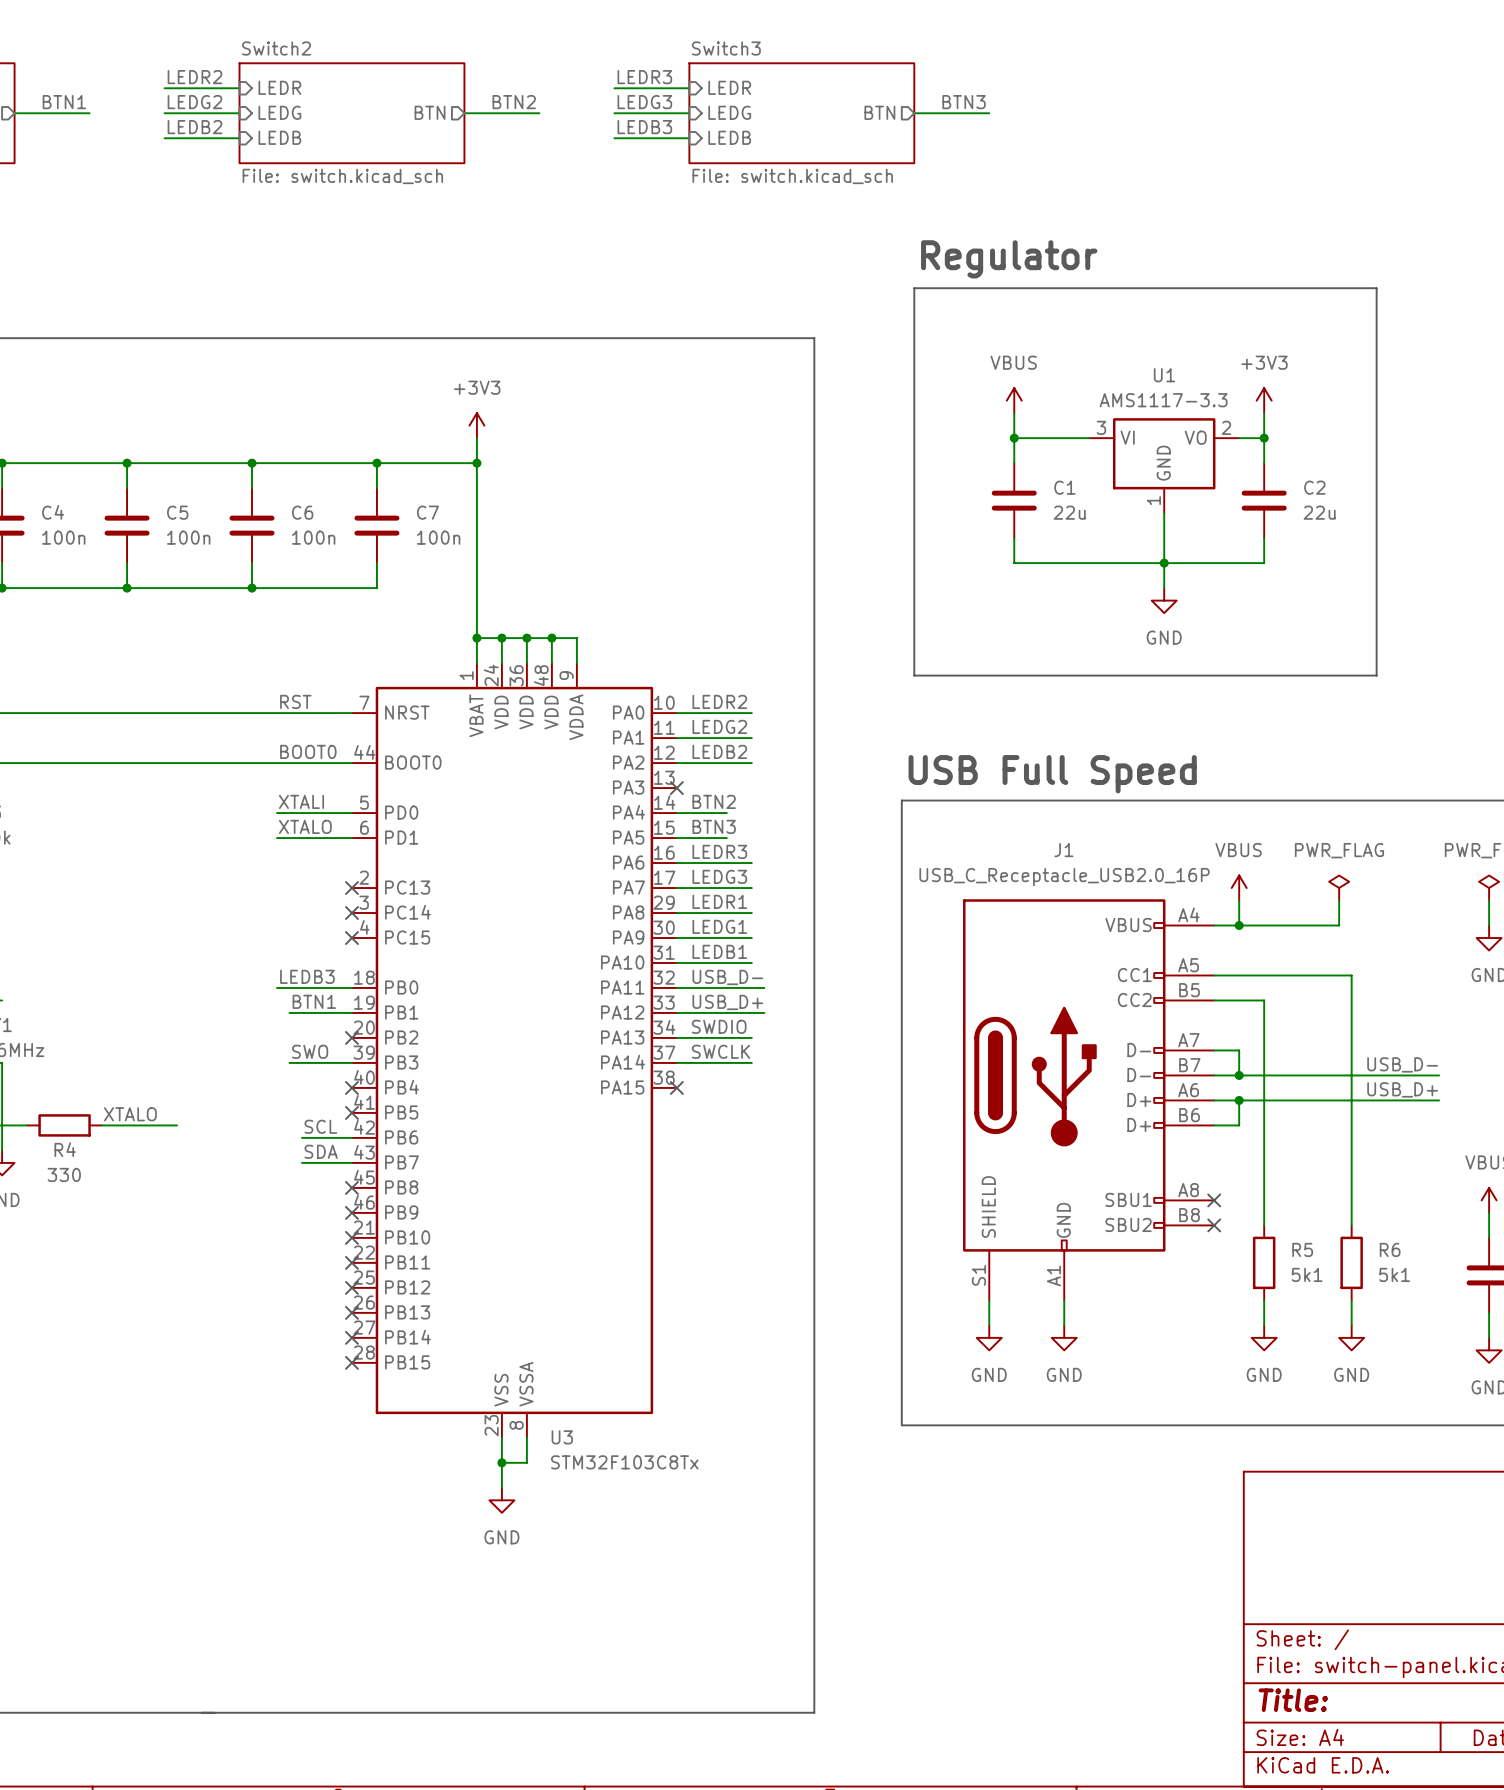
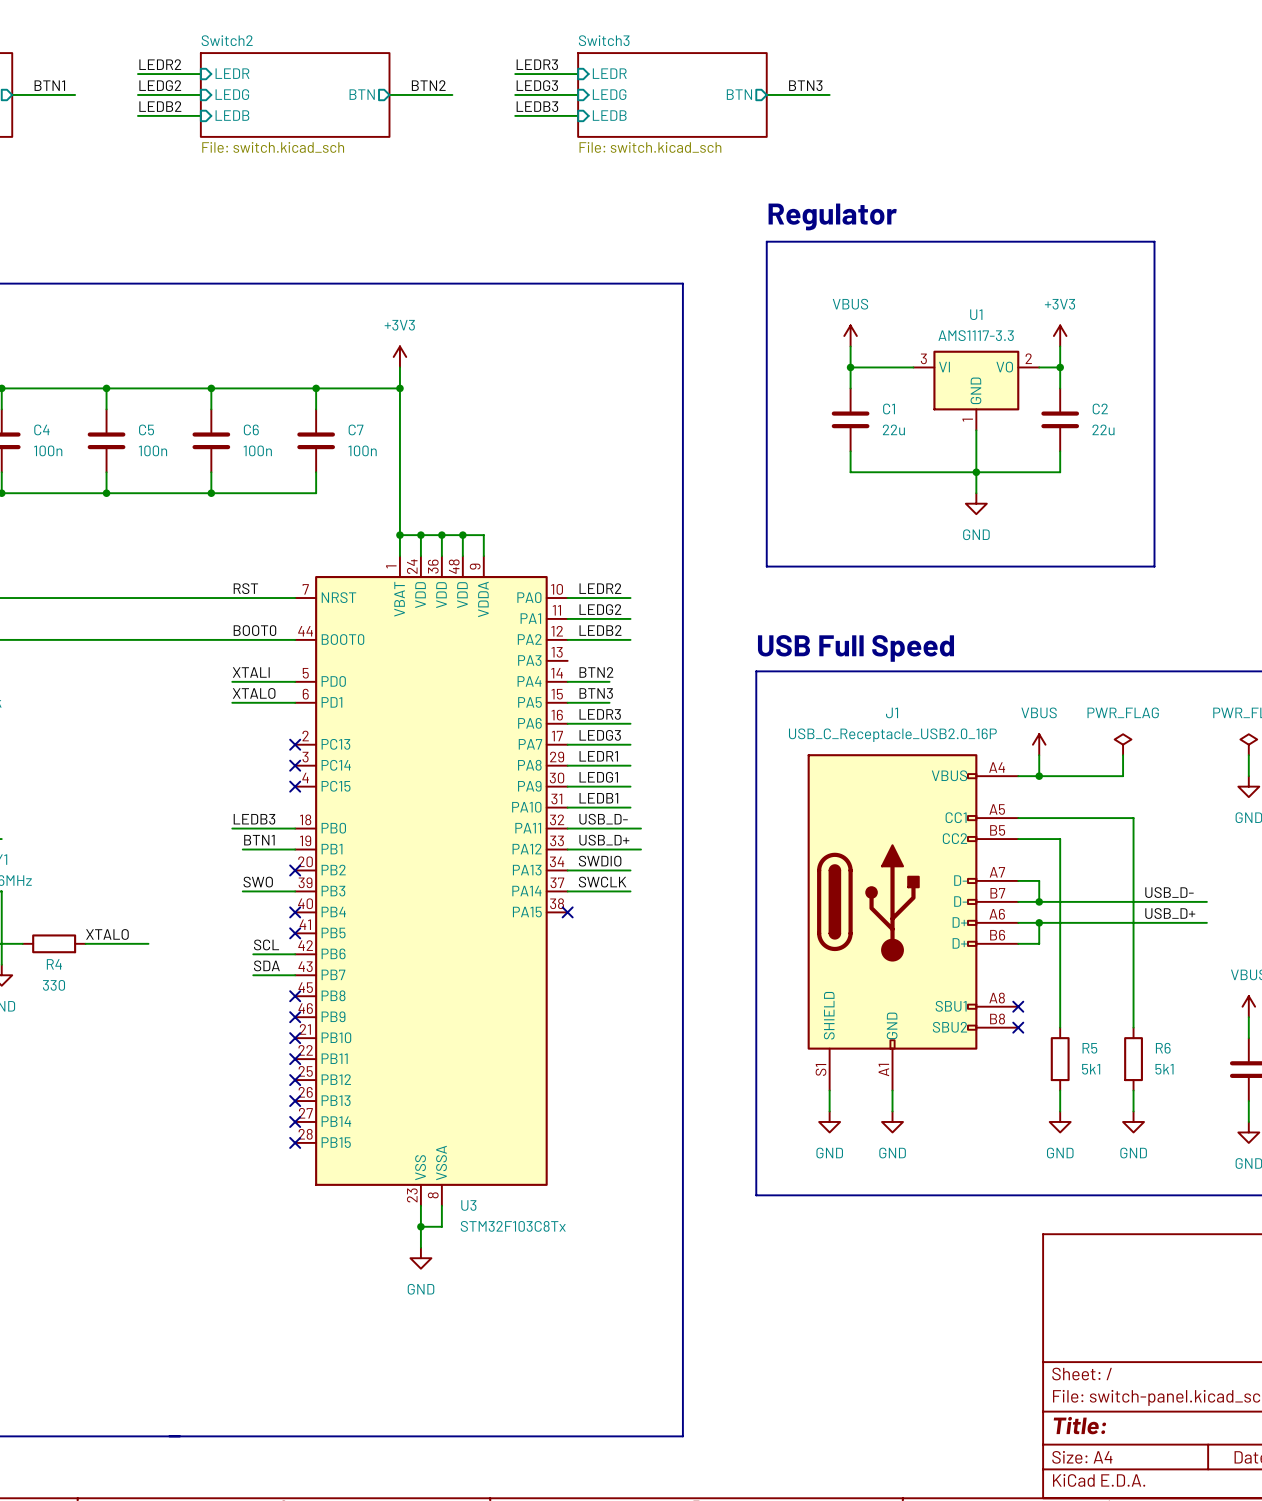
no-connect mark: (676, 788) -> none

